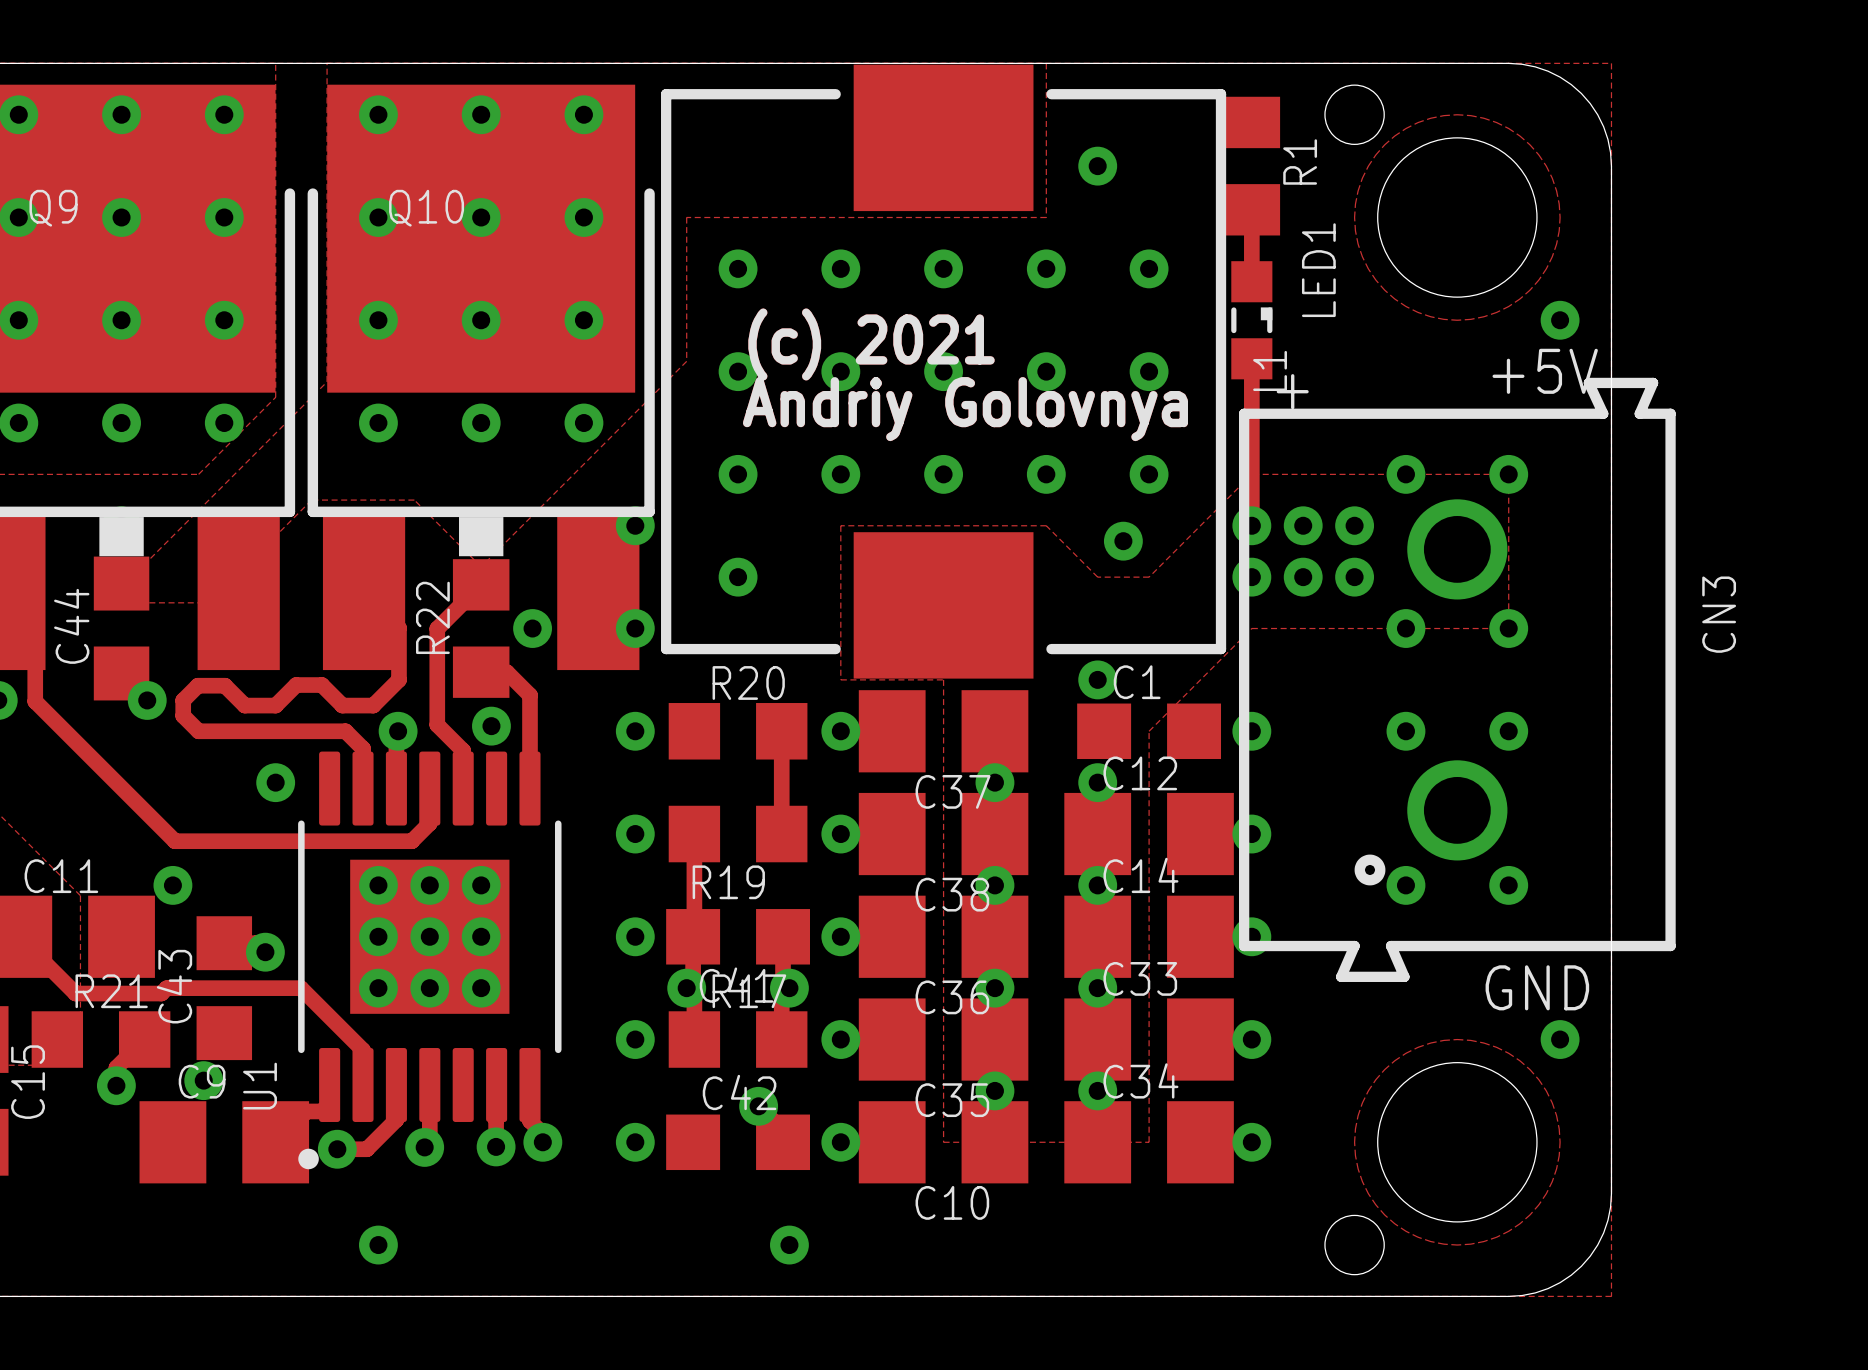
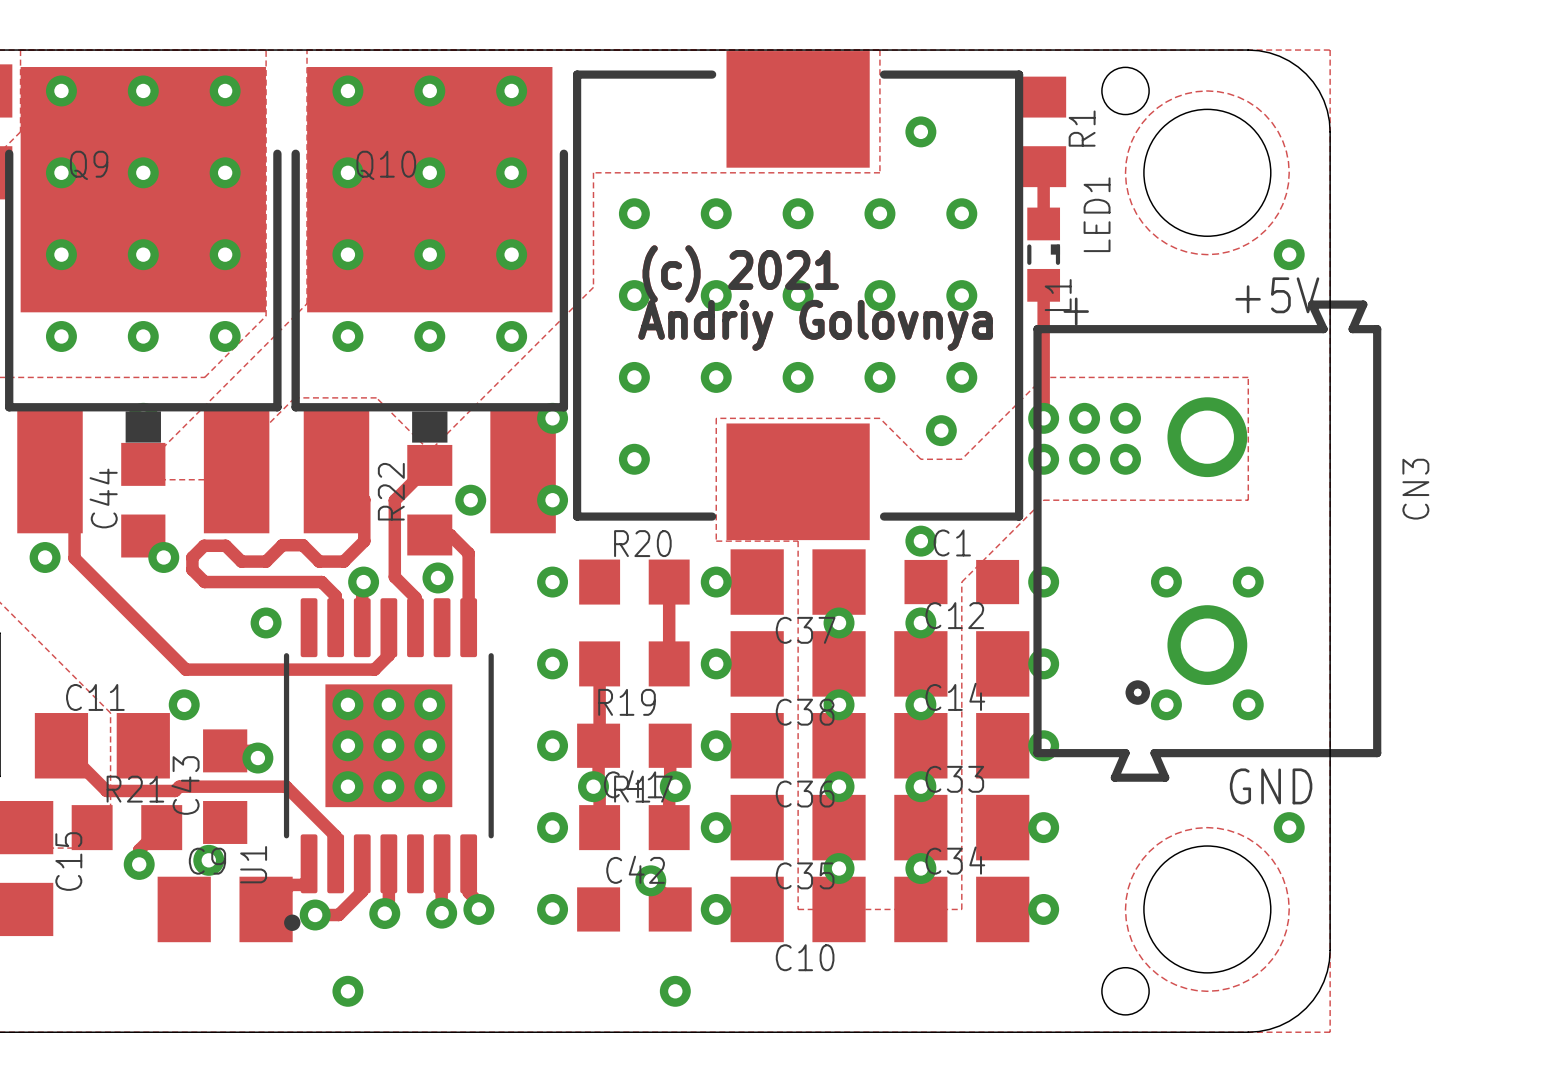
via: (1405, 474) -> none
via: (1508, 474) -> none
via: (1405, 628) -> none
via: (1508, 628) -> none

